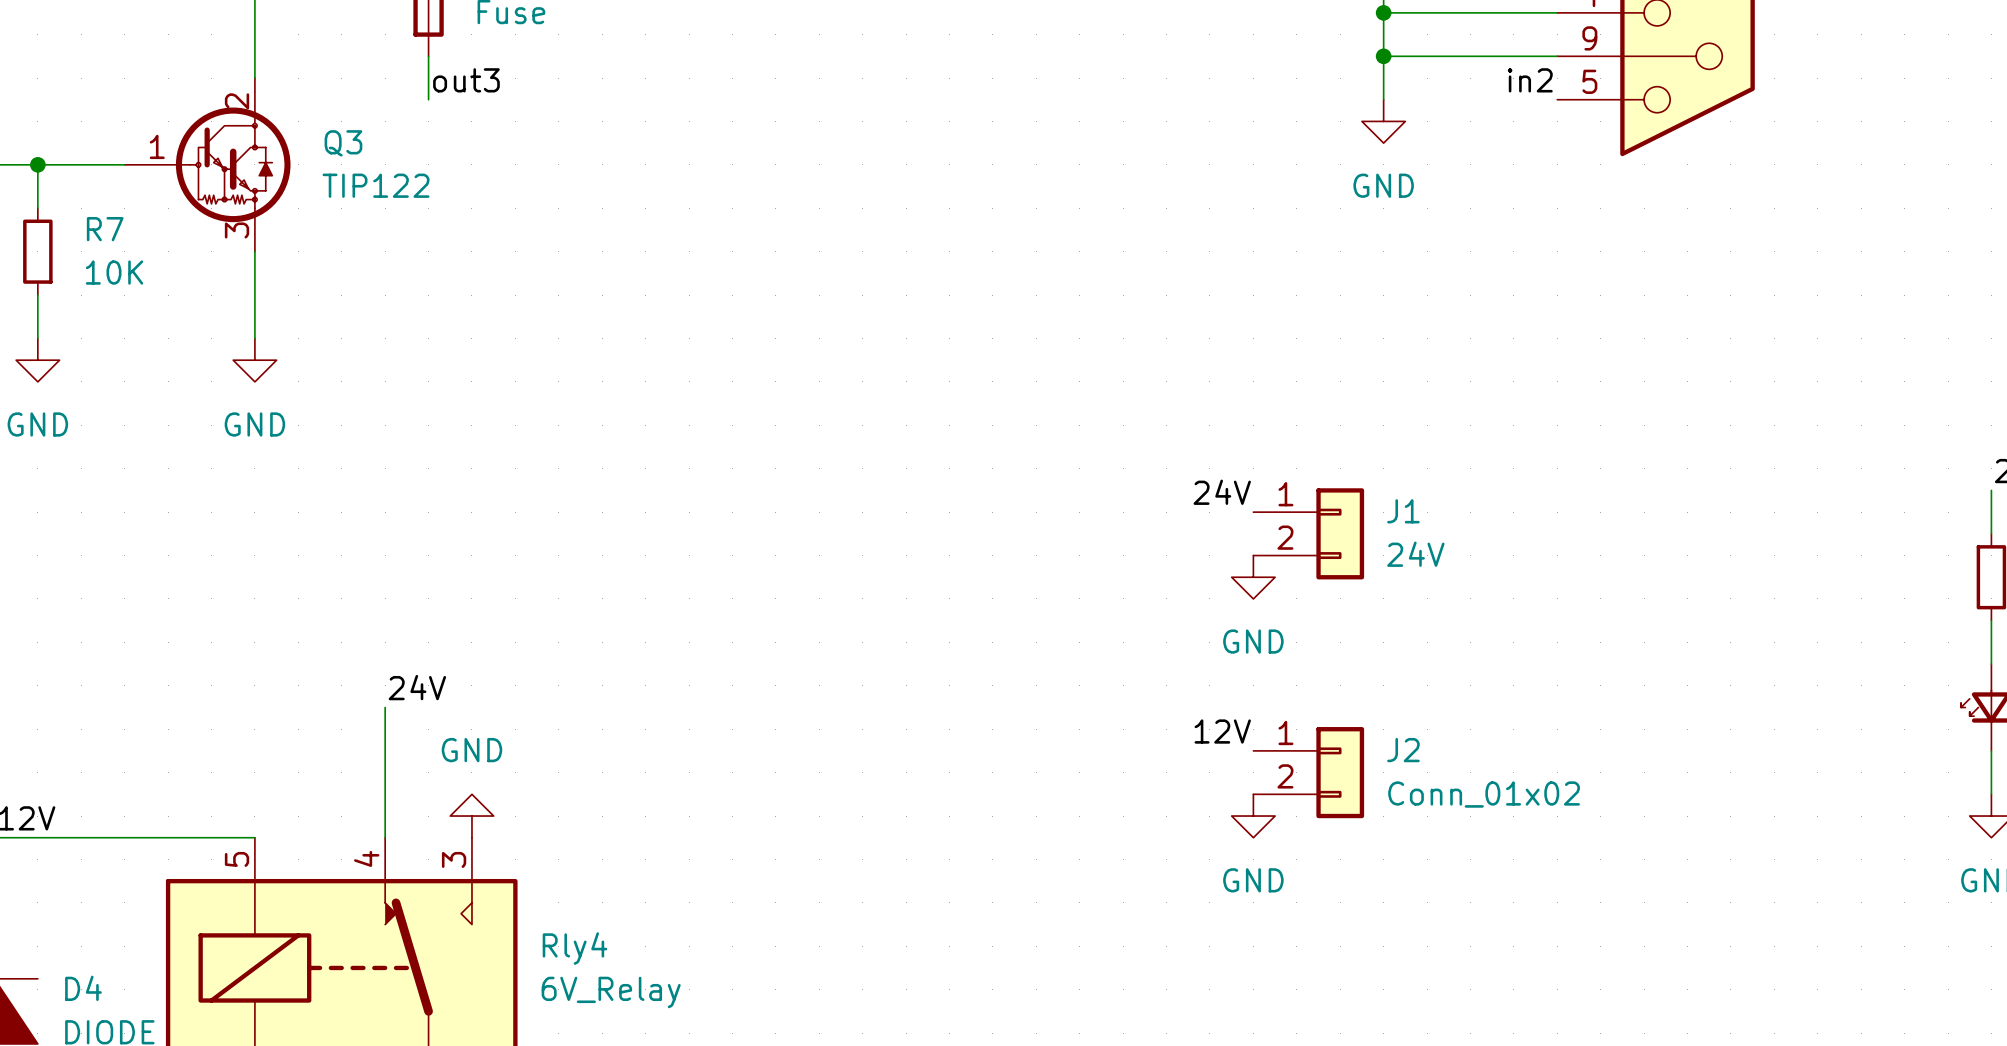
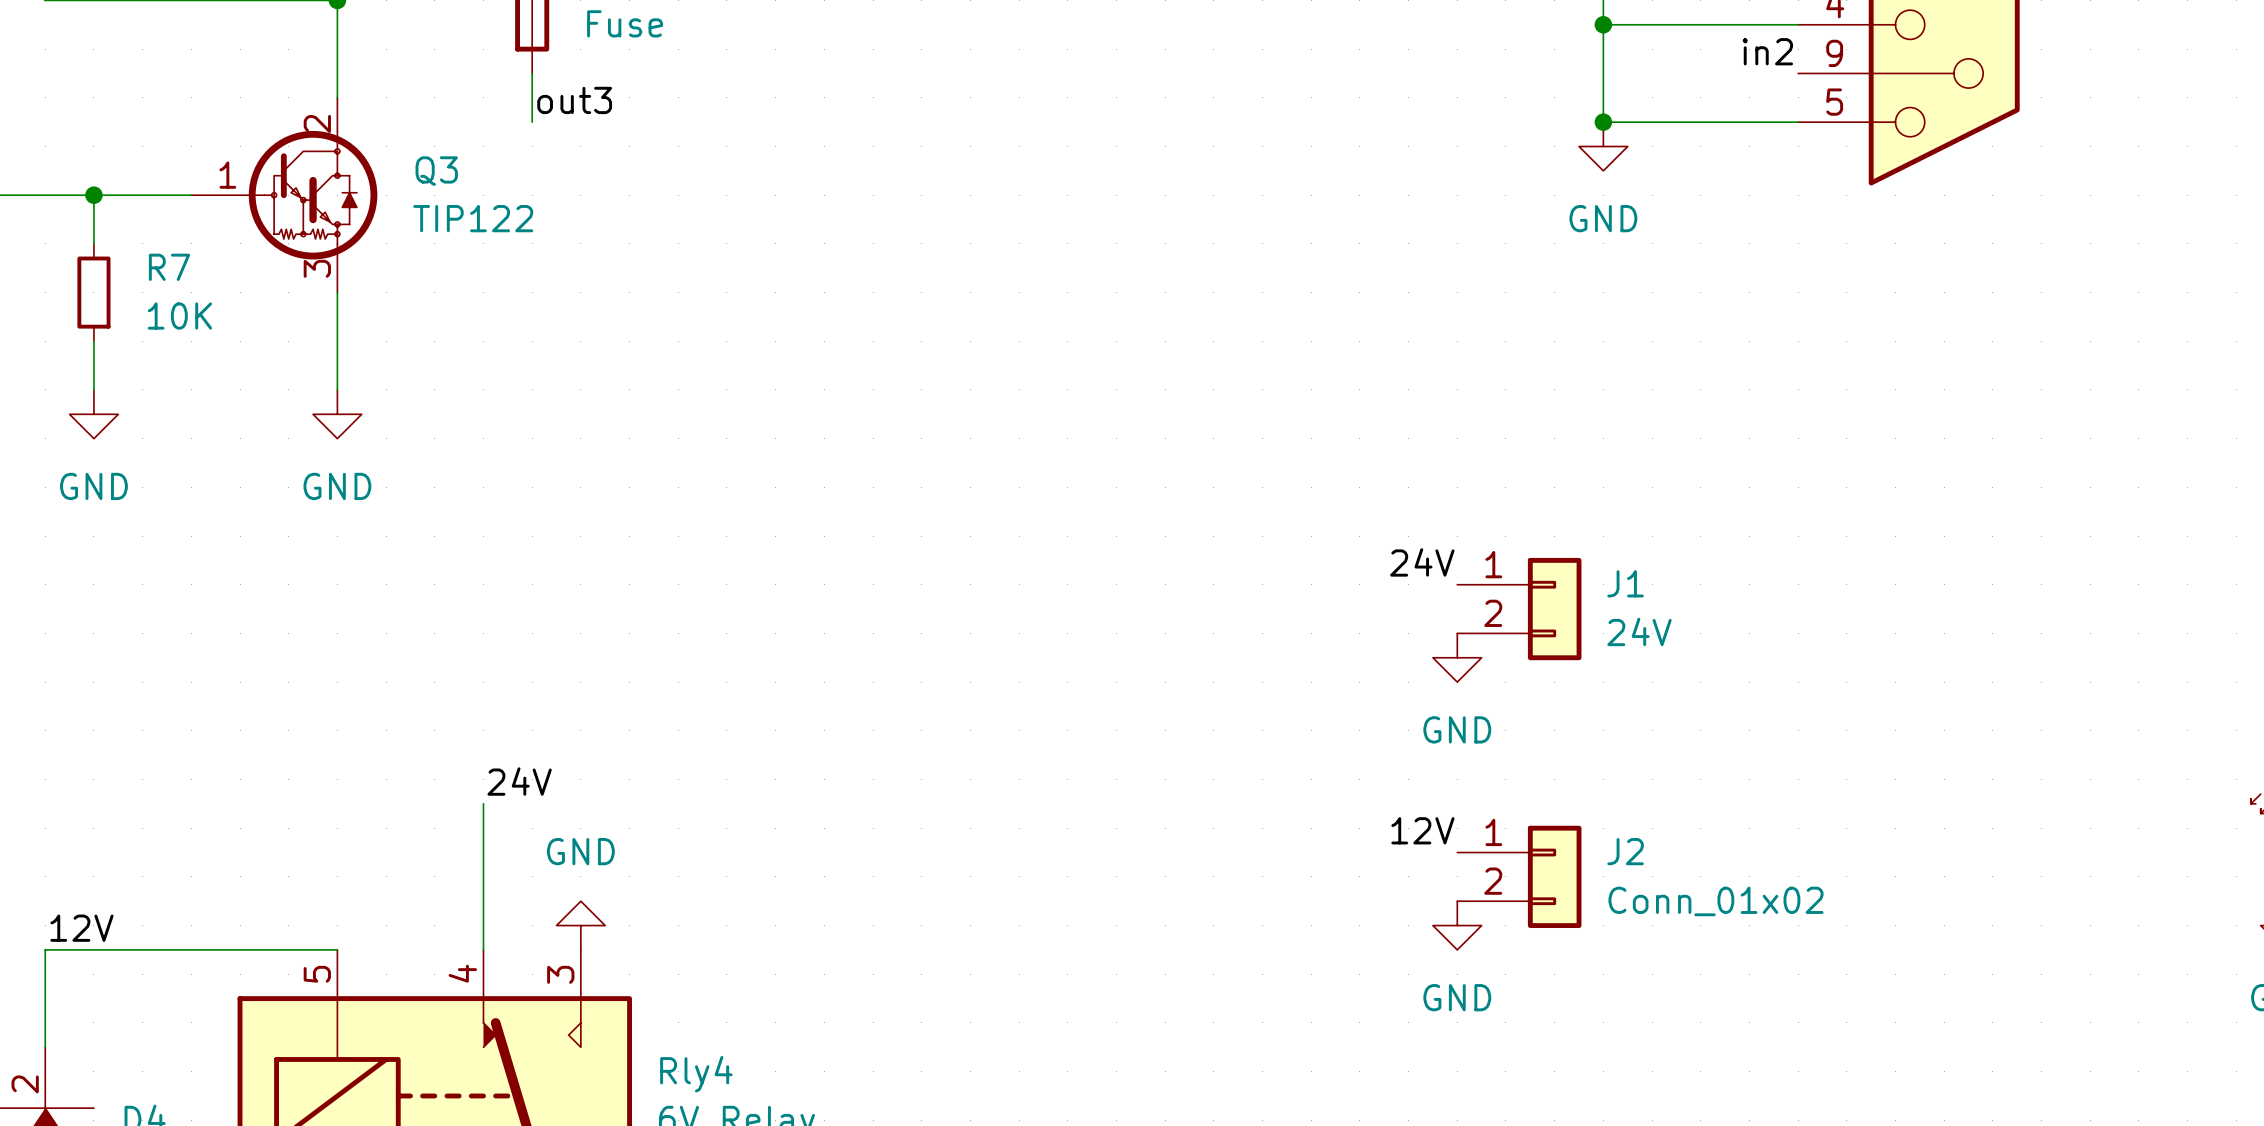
wire: (1383, 56) (1557, 56) -> (1603, 122) (1798, 122)
junction position: (1383, 56) -> (1603, 122)
label position: in2 (1530, 80) -> in2 (1767, 51)

